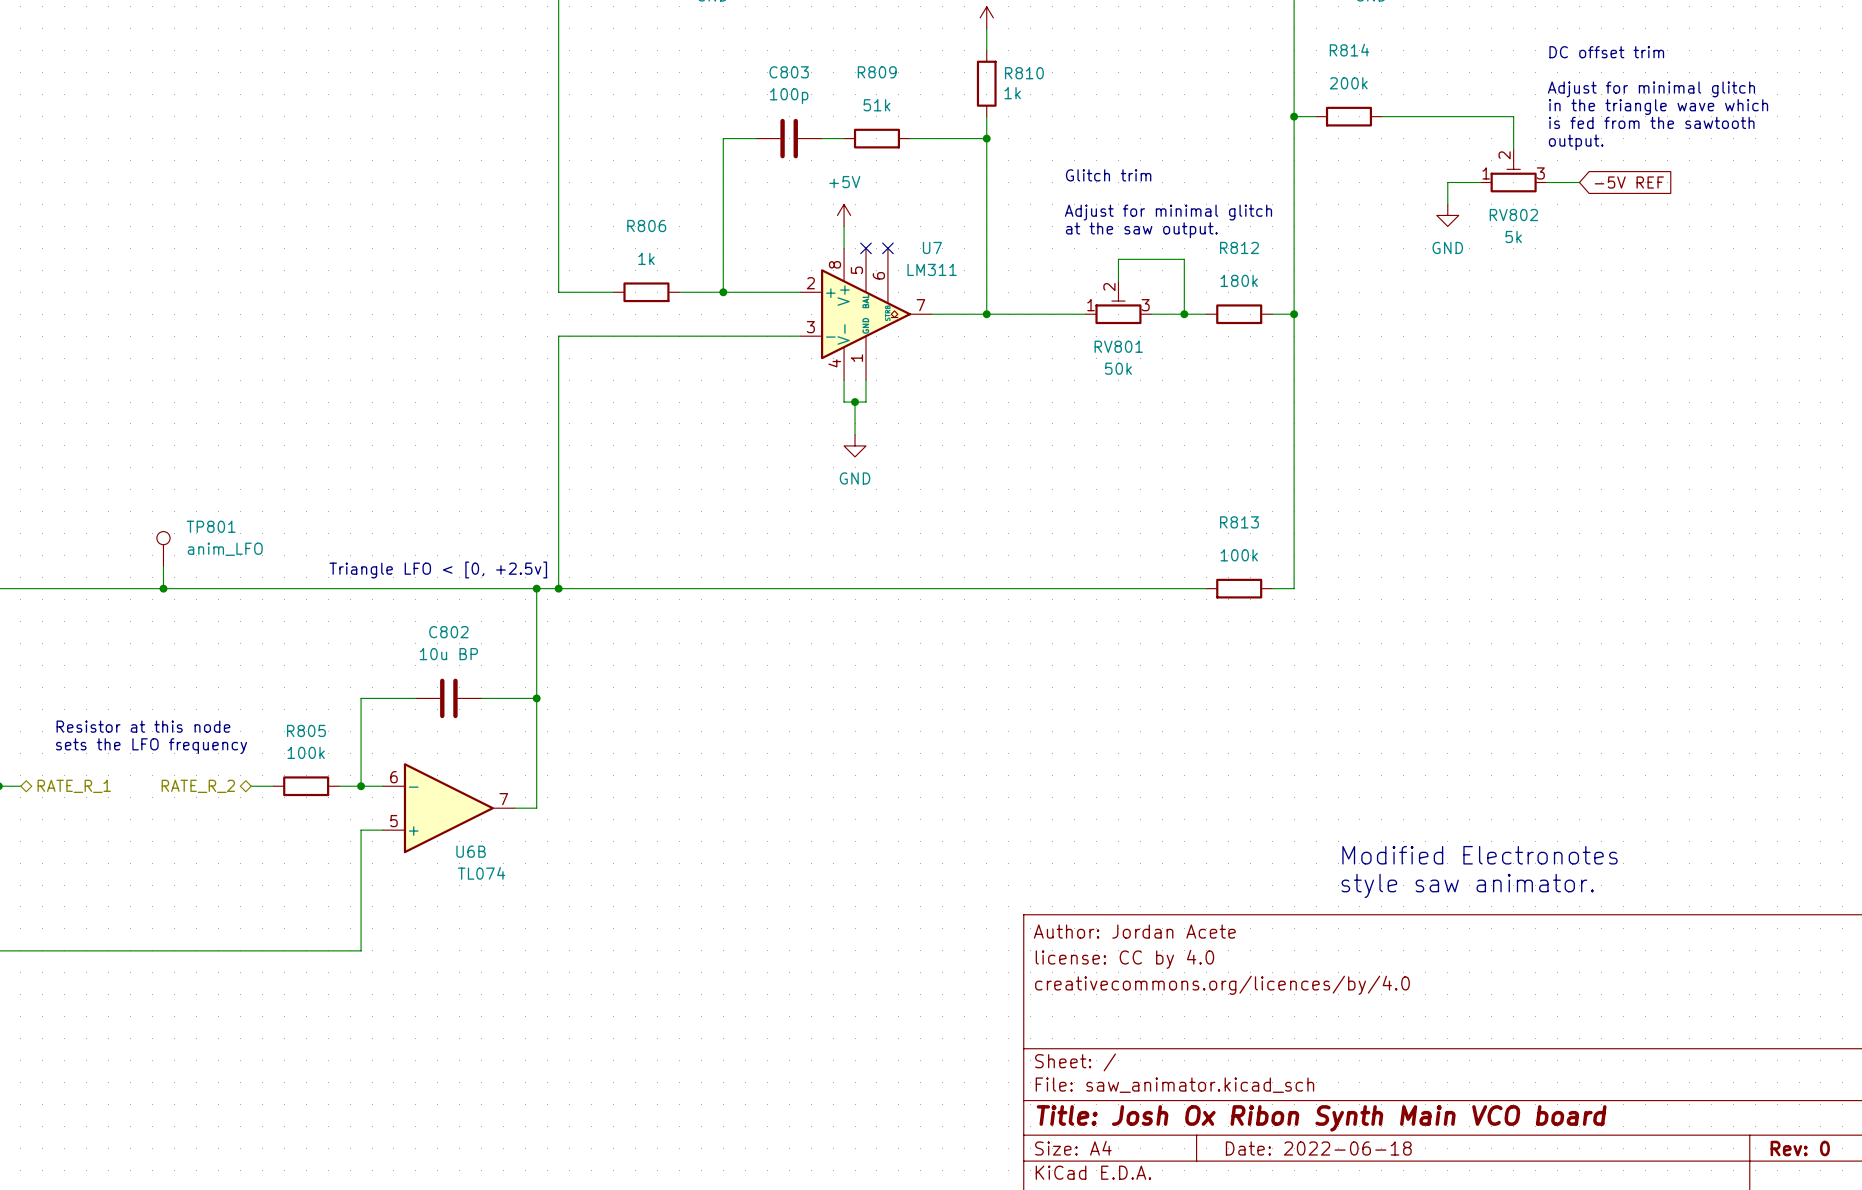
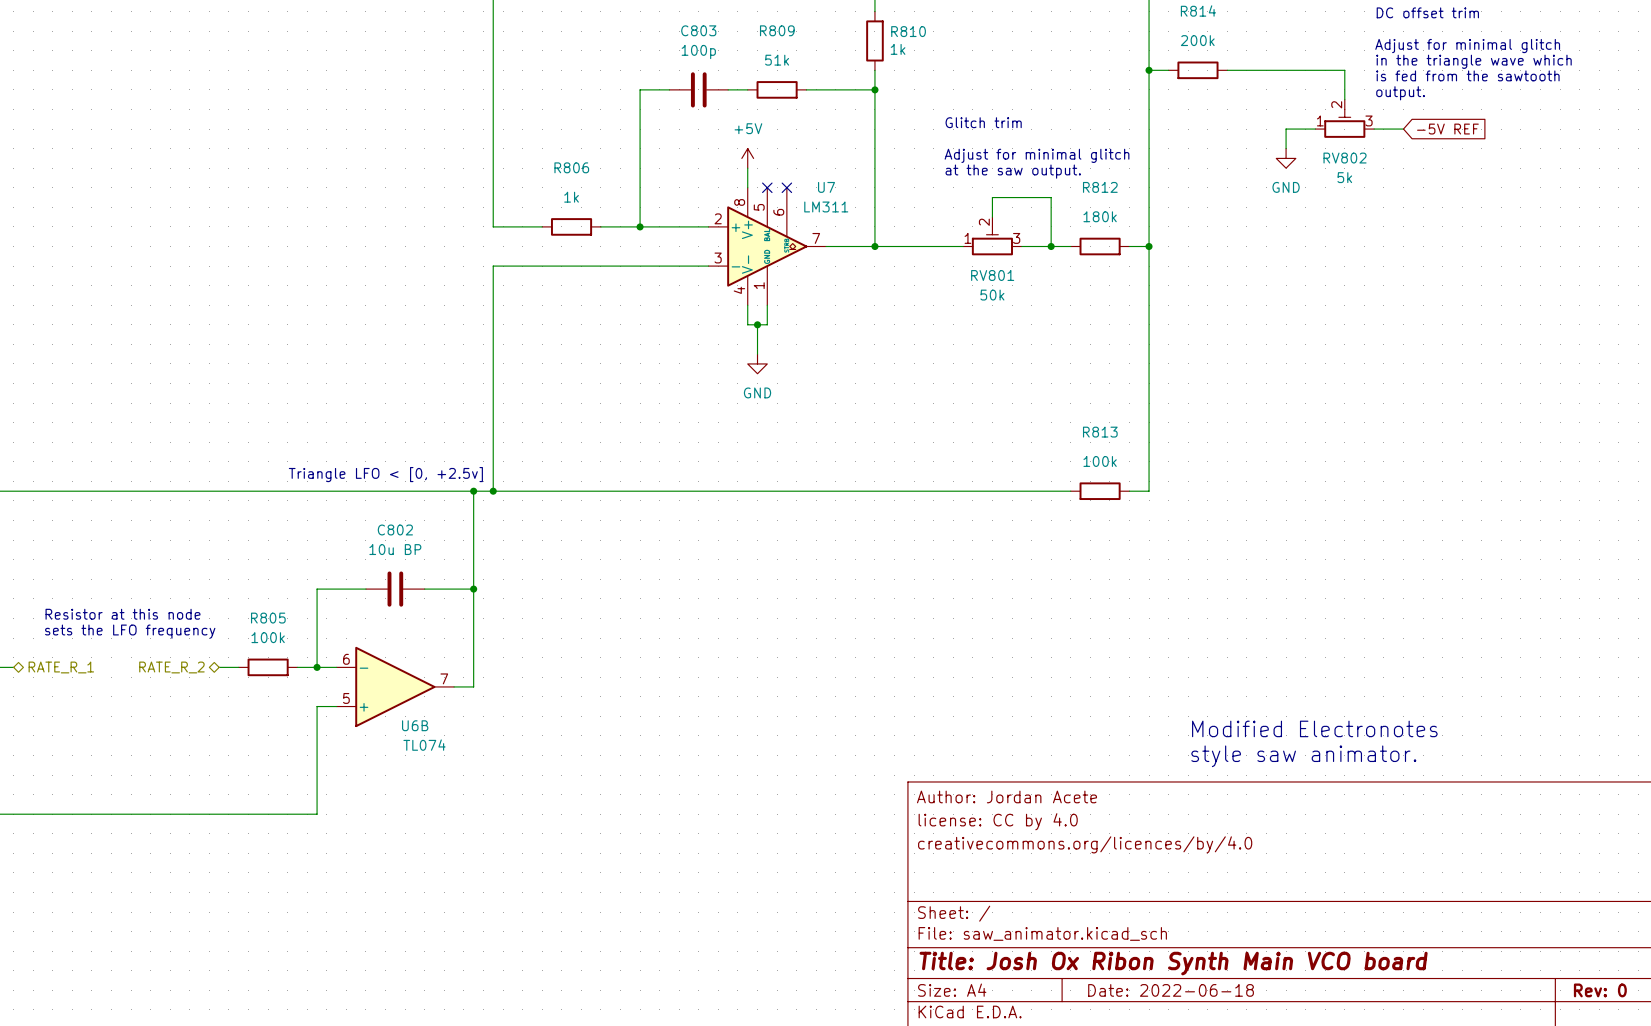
TP801: anim_LFO (163, 549) -> none
wire: (163, 566) (163, 588) -> none
junction: (163, 588) -> none

